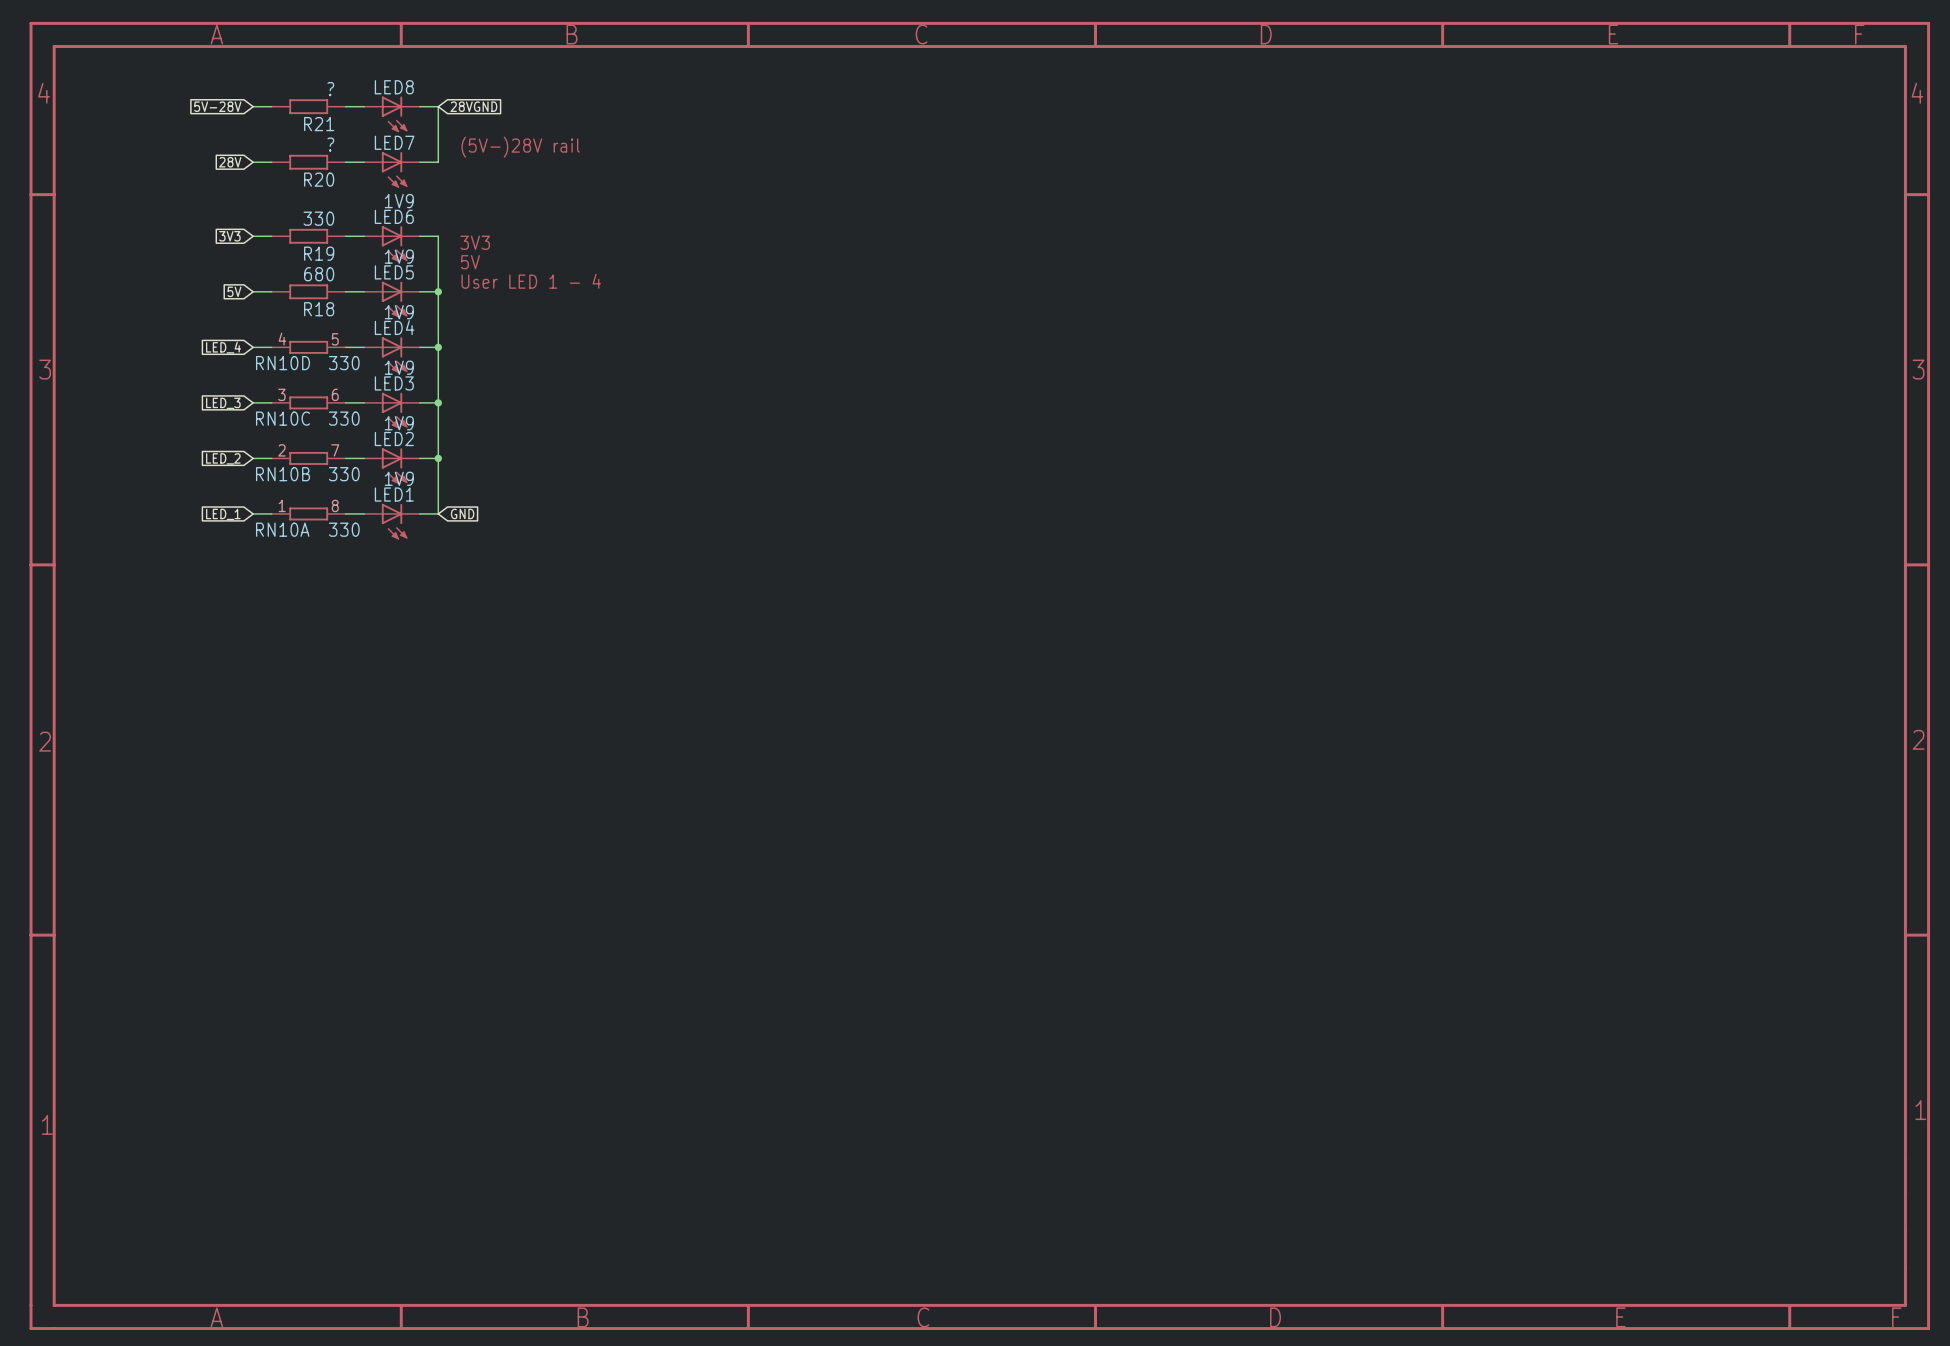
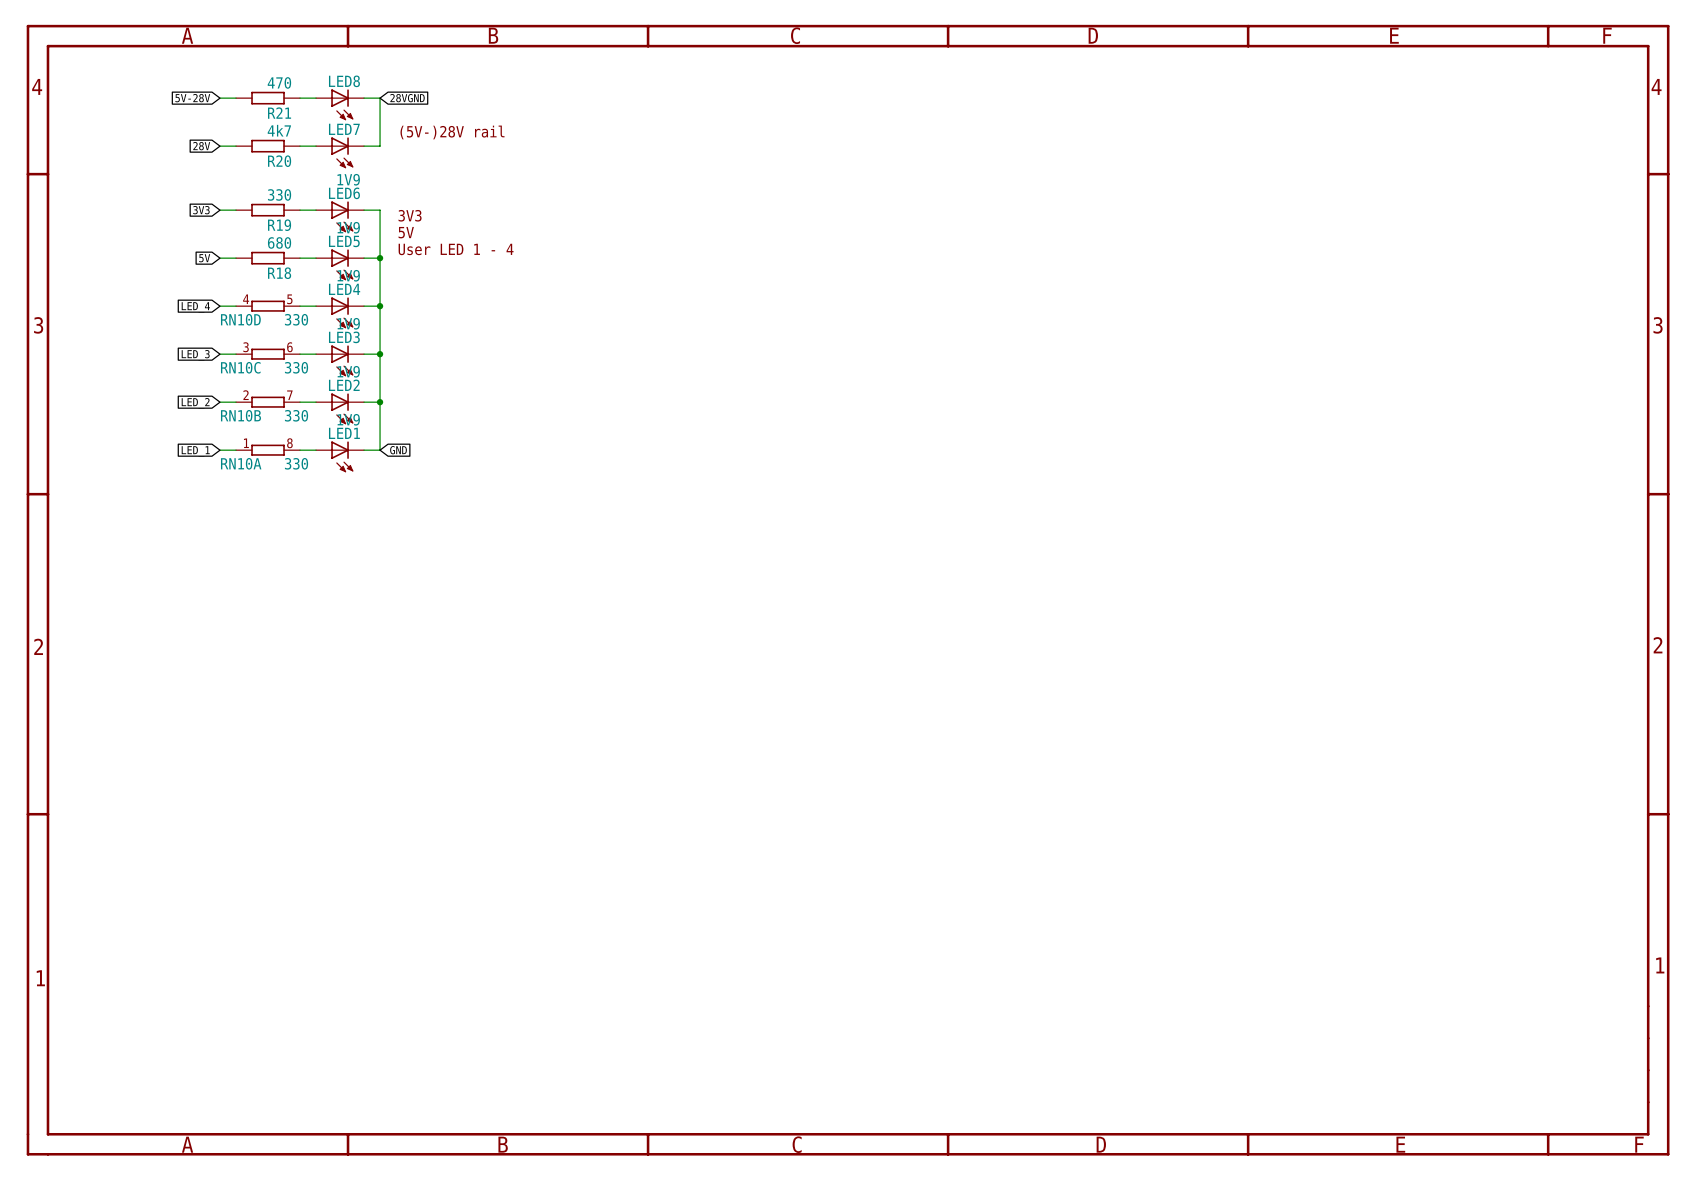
R21 value: ? (330, 89) -> 470 (279, 82)
R20 value: ? (330, 144) -> 4k7 (279, 130)

